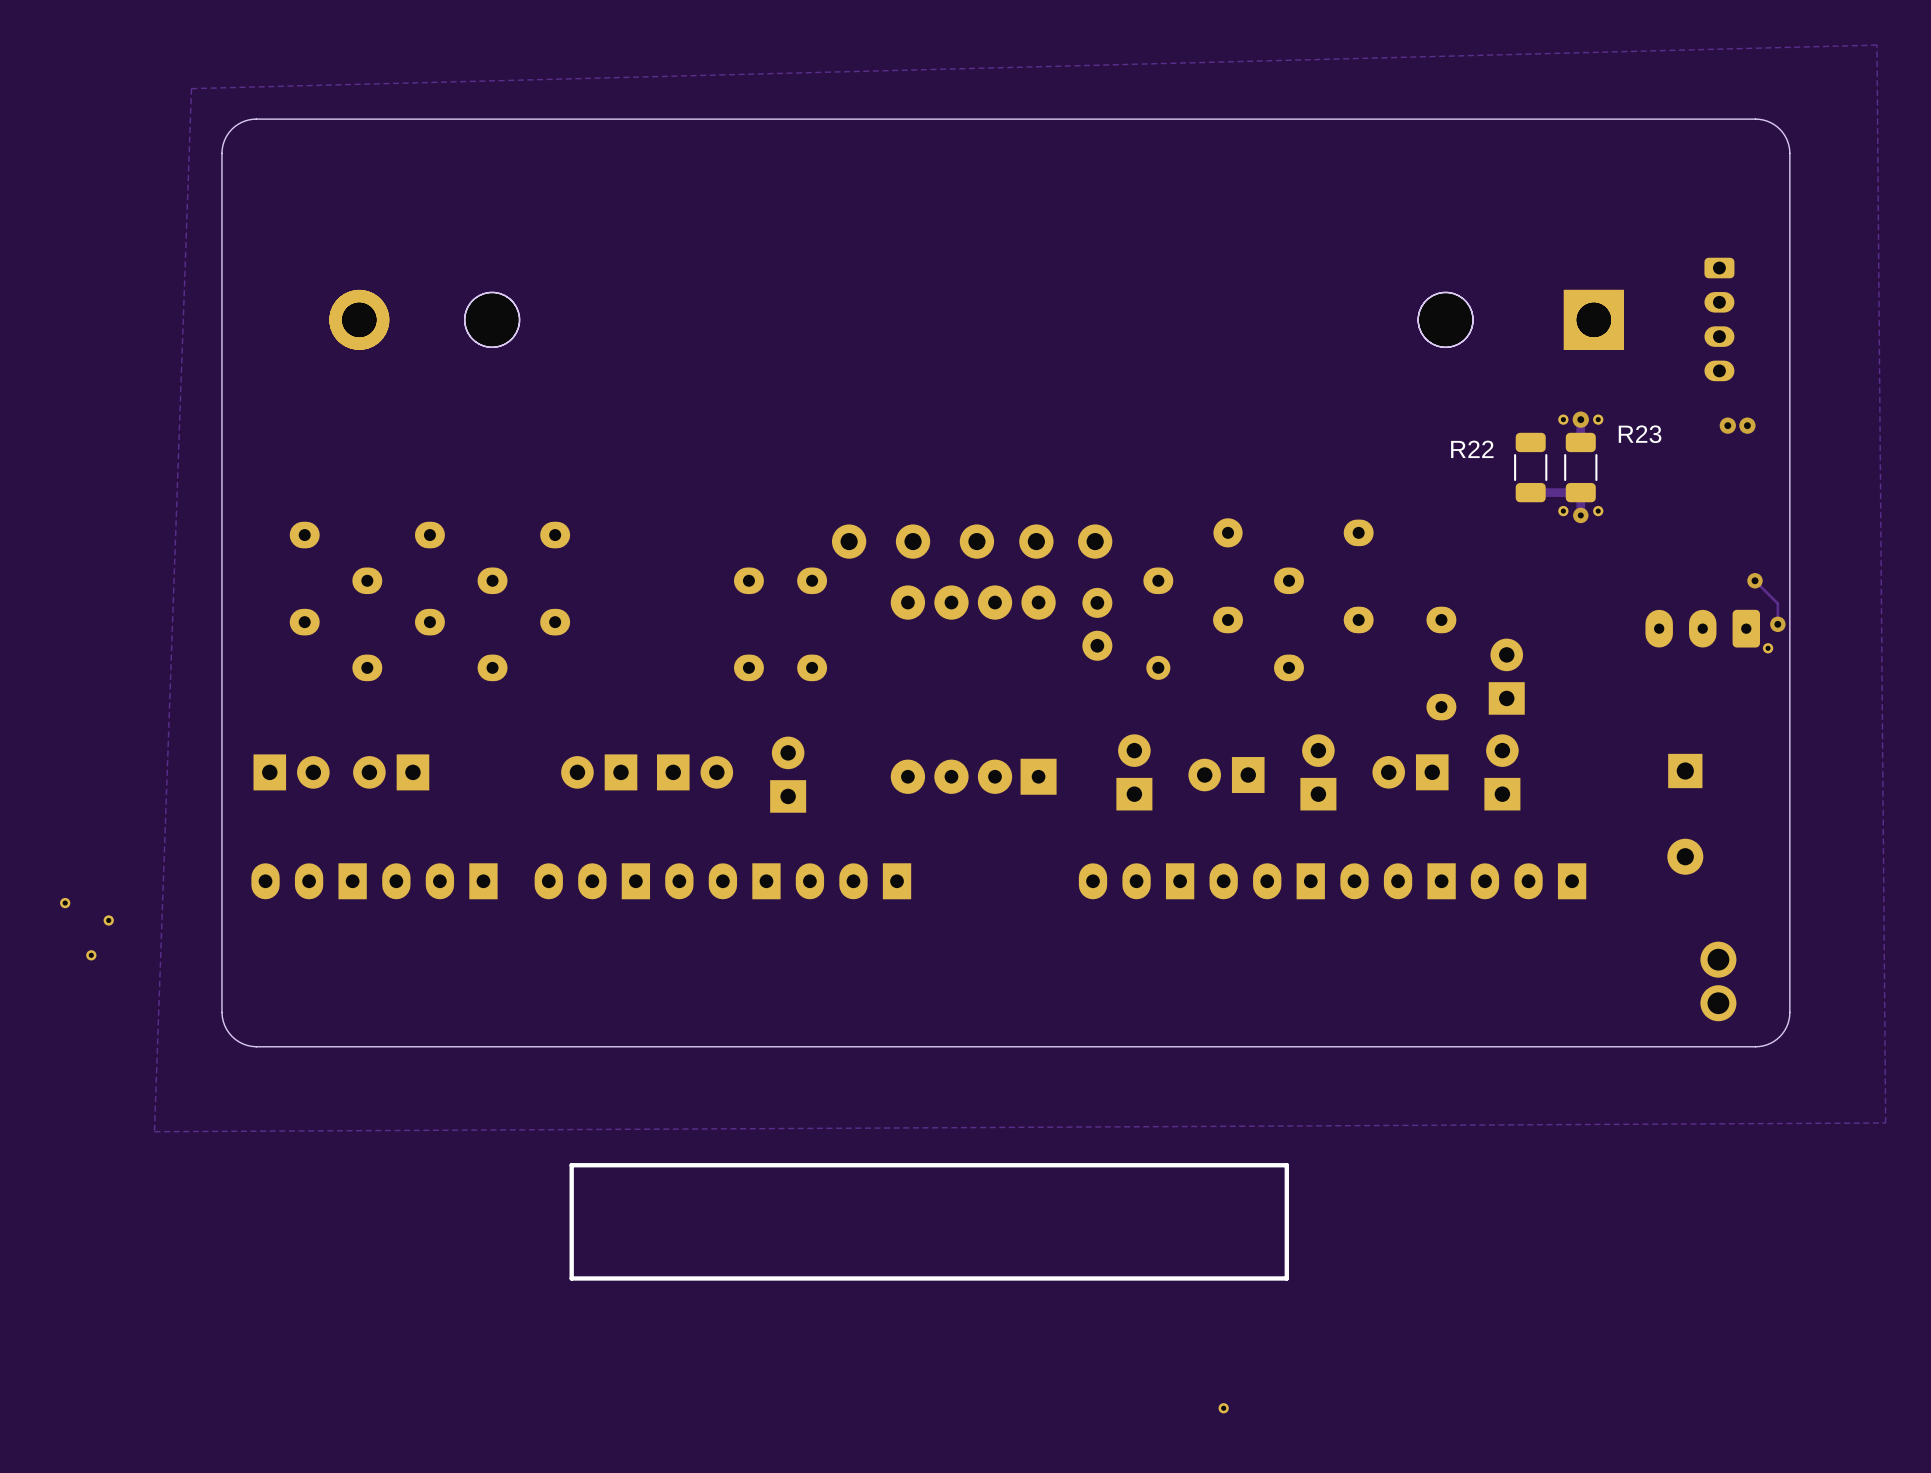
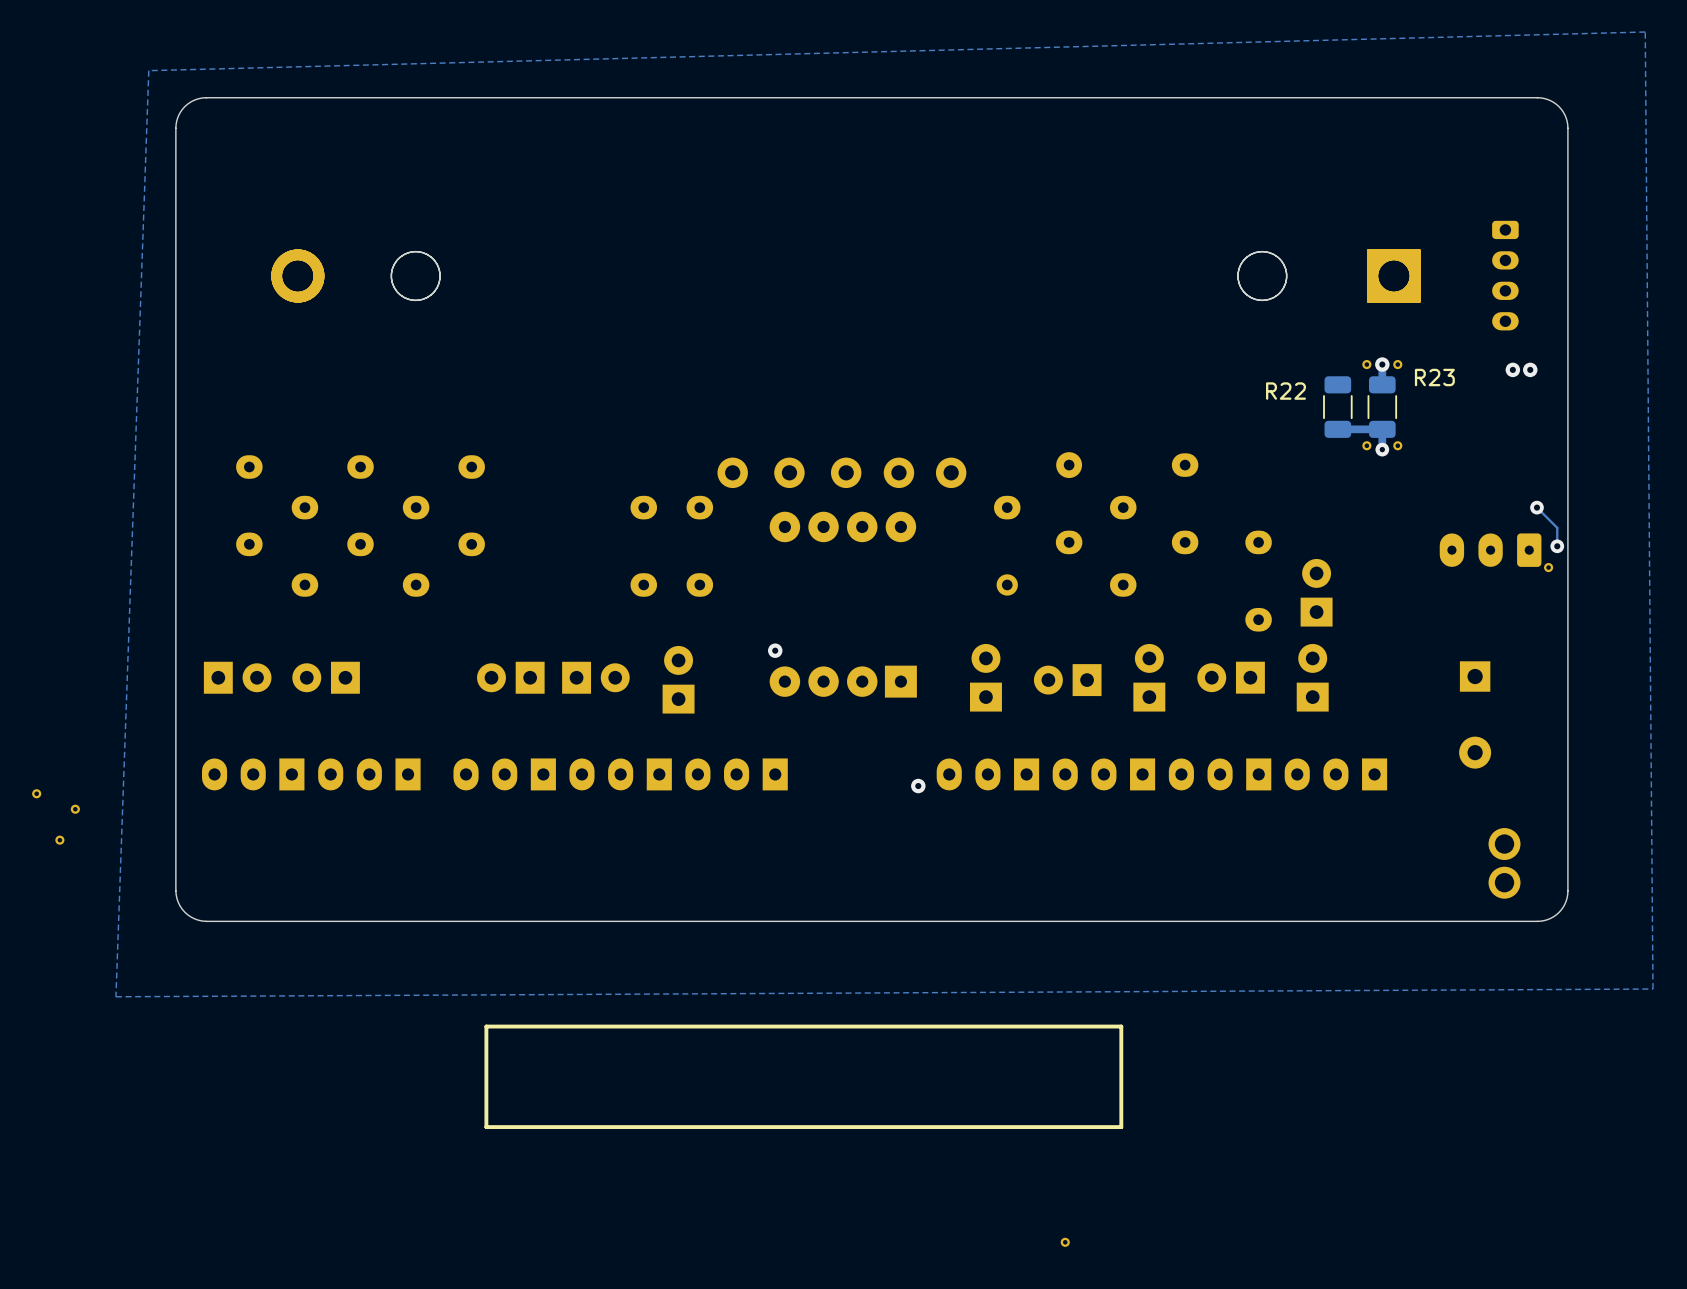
part: (1097, 624) -> none
via: none -> (775, 650)
via: none -> (918, 786)

